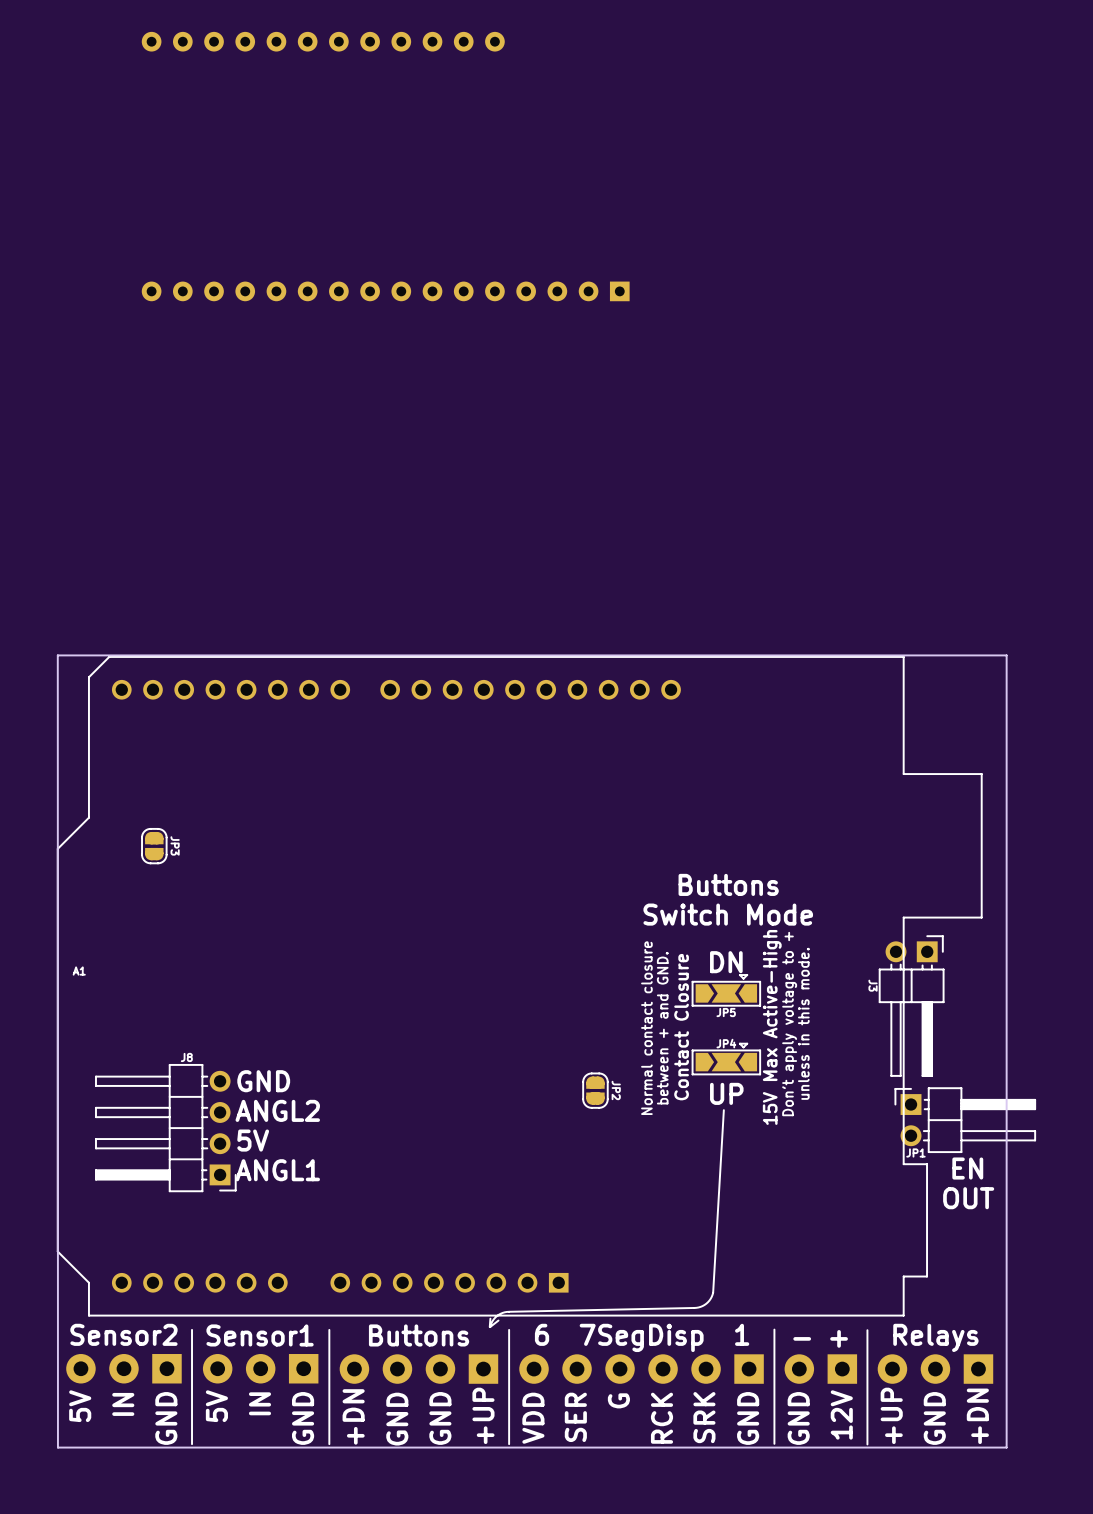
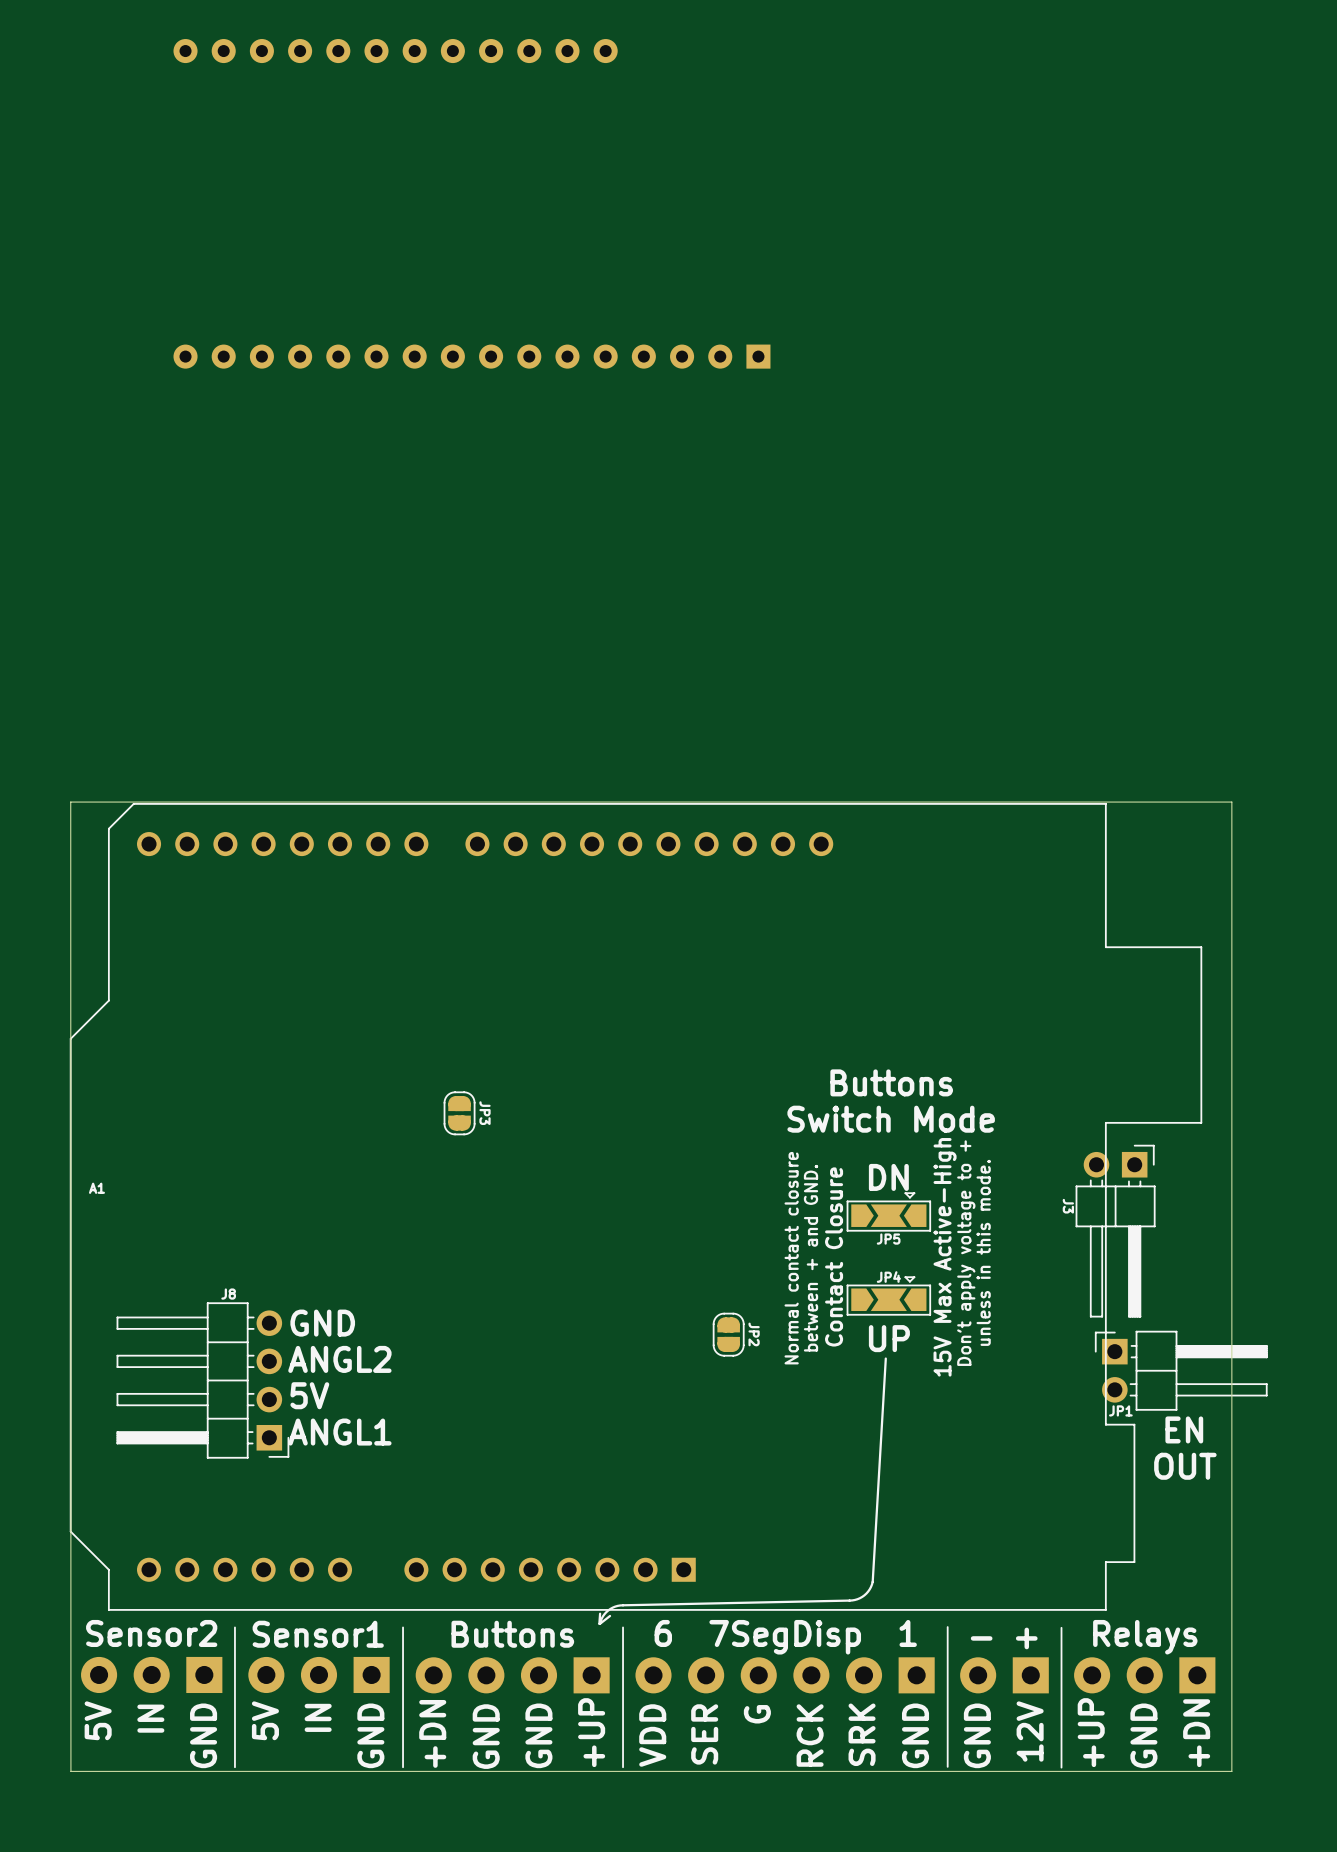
JP3 position: (154, 846) -> (459, 1113)

